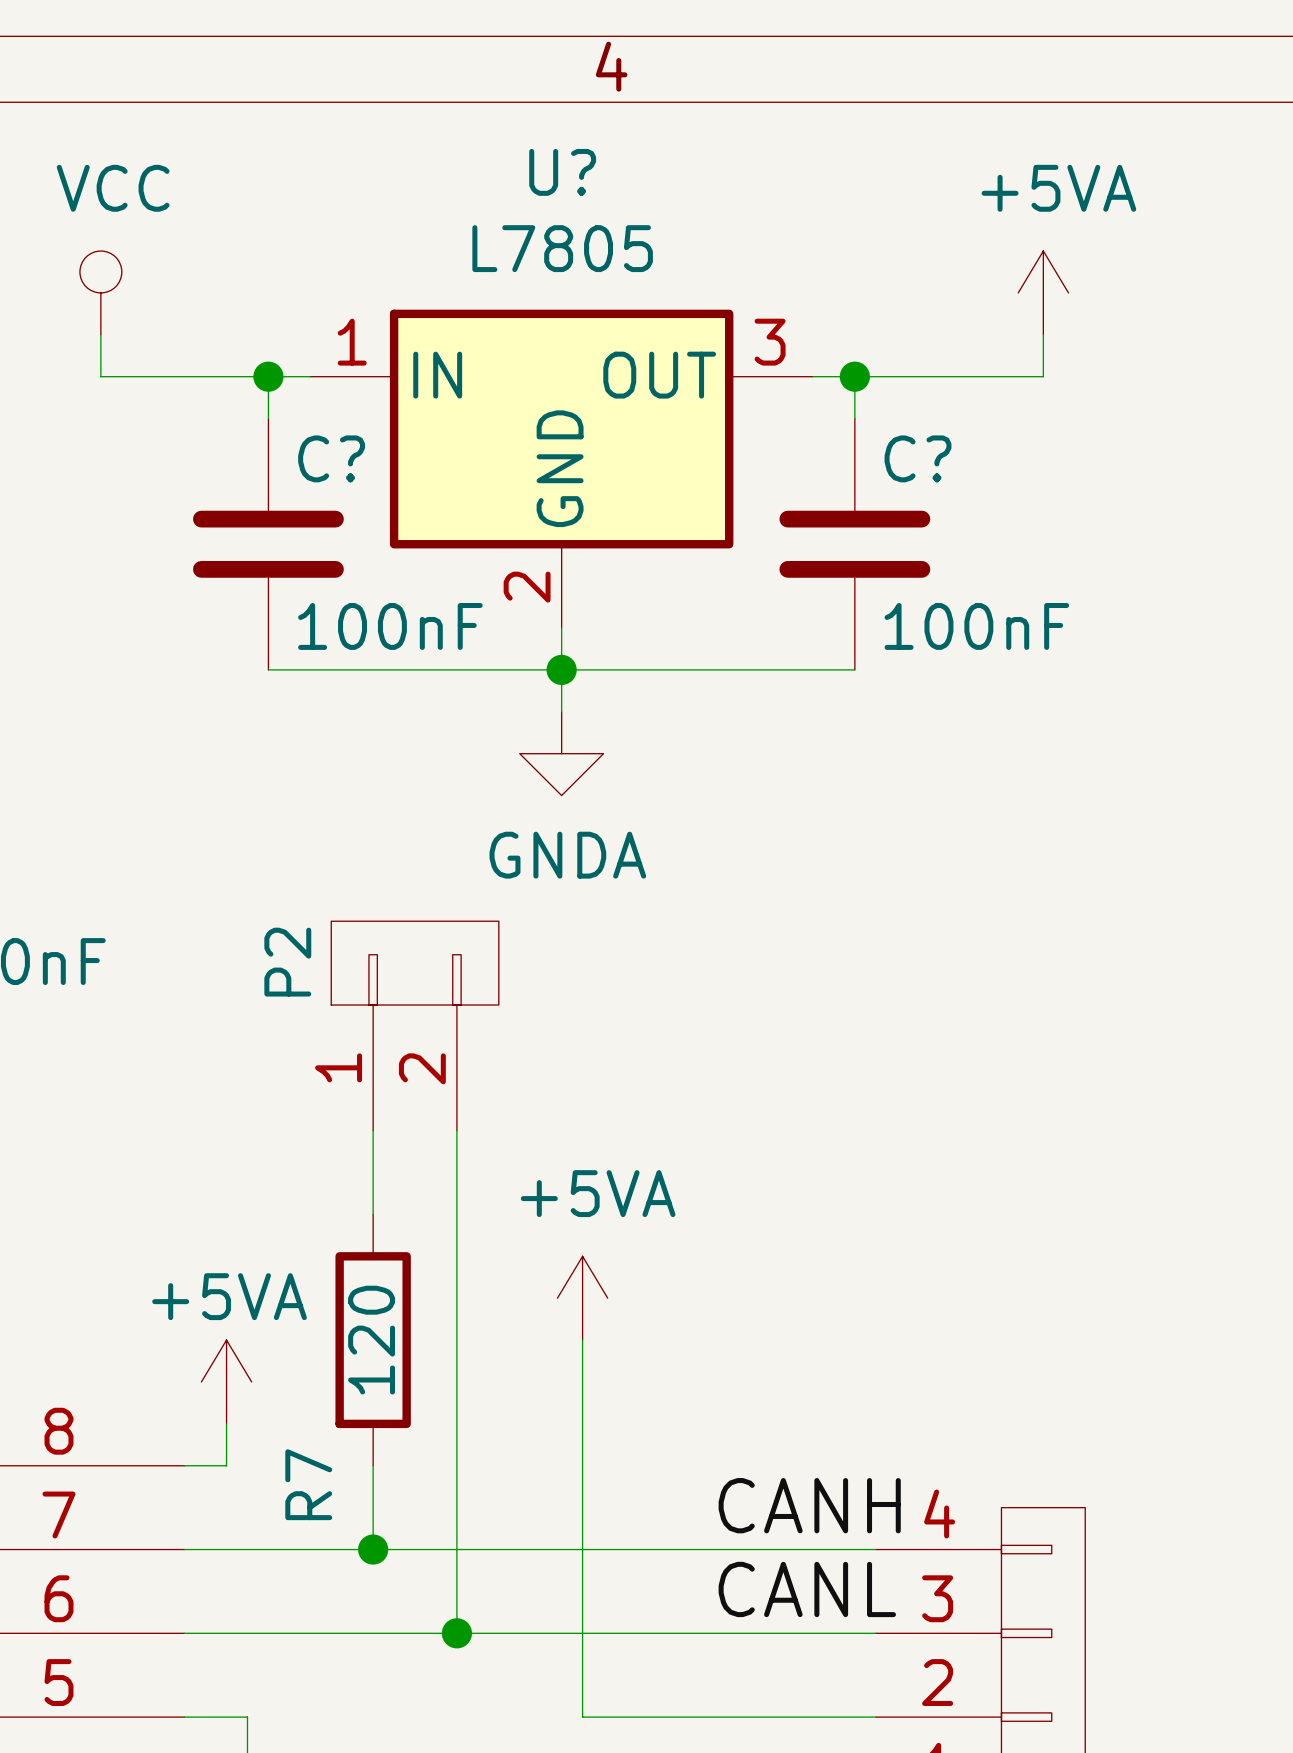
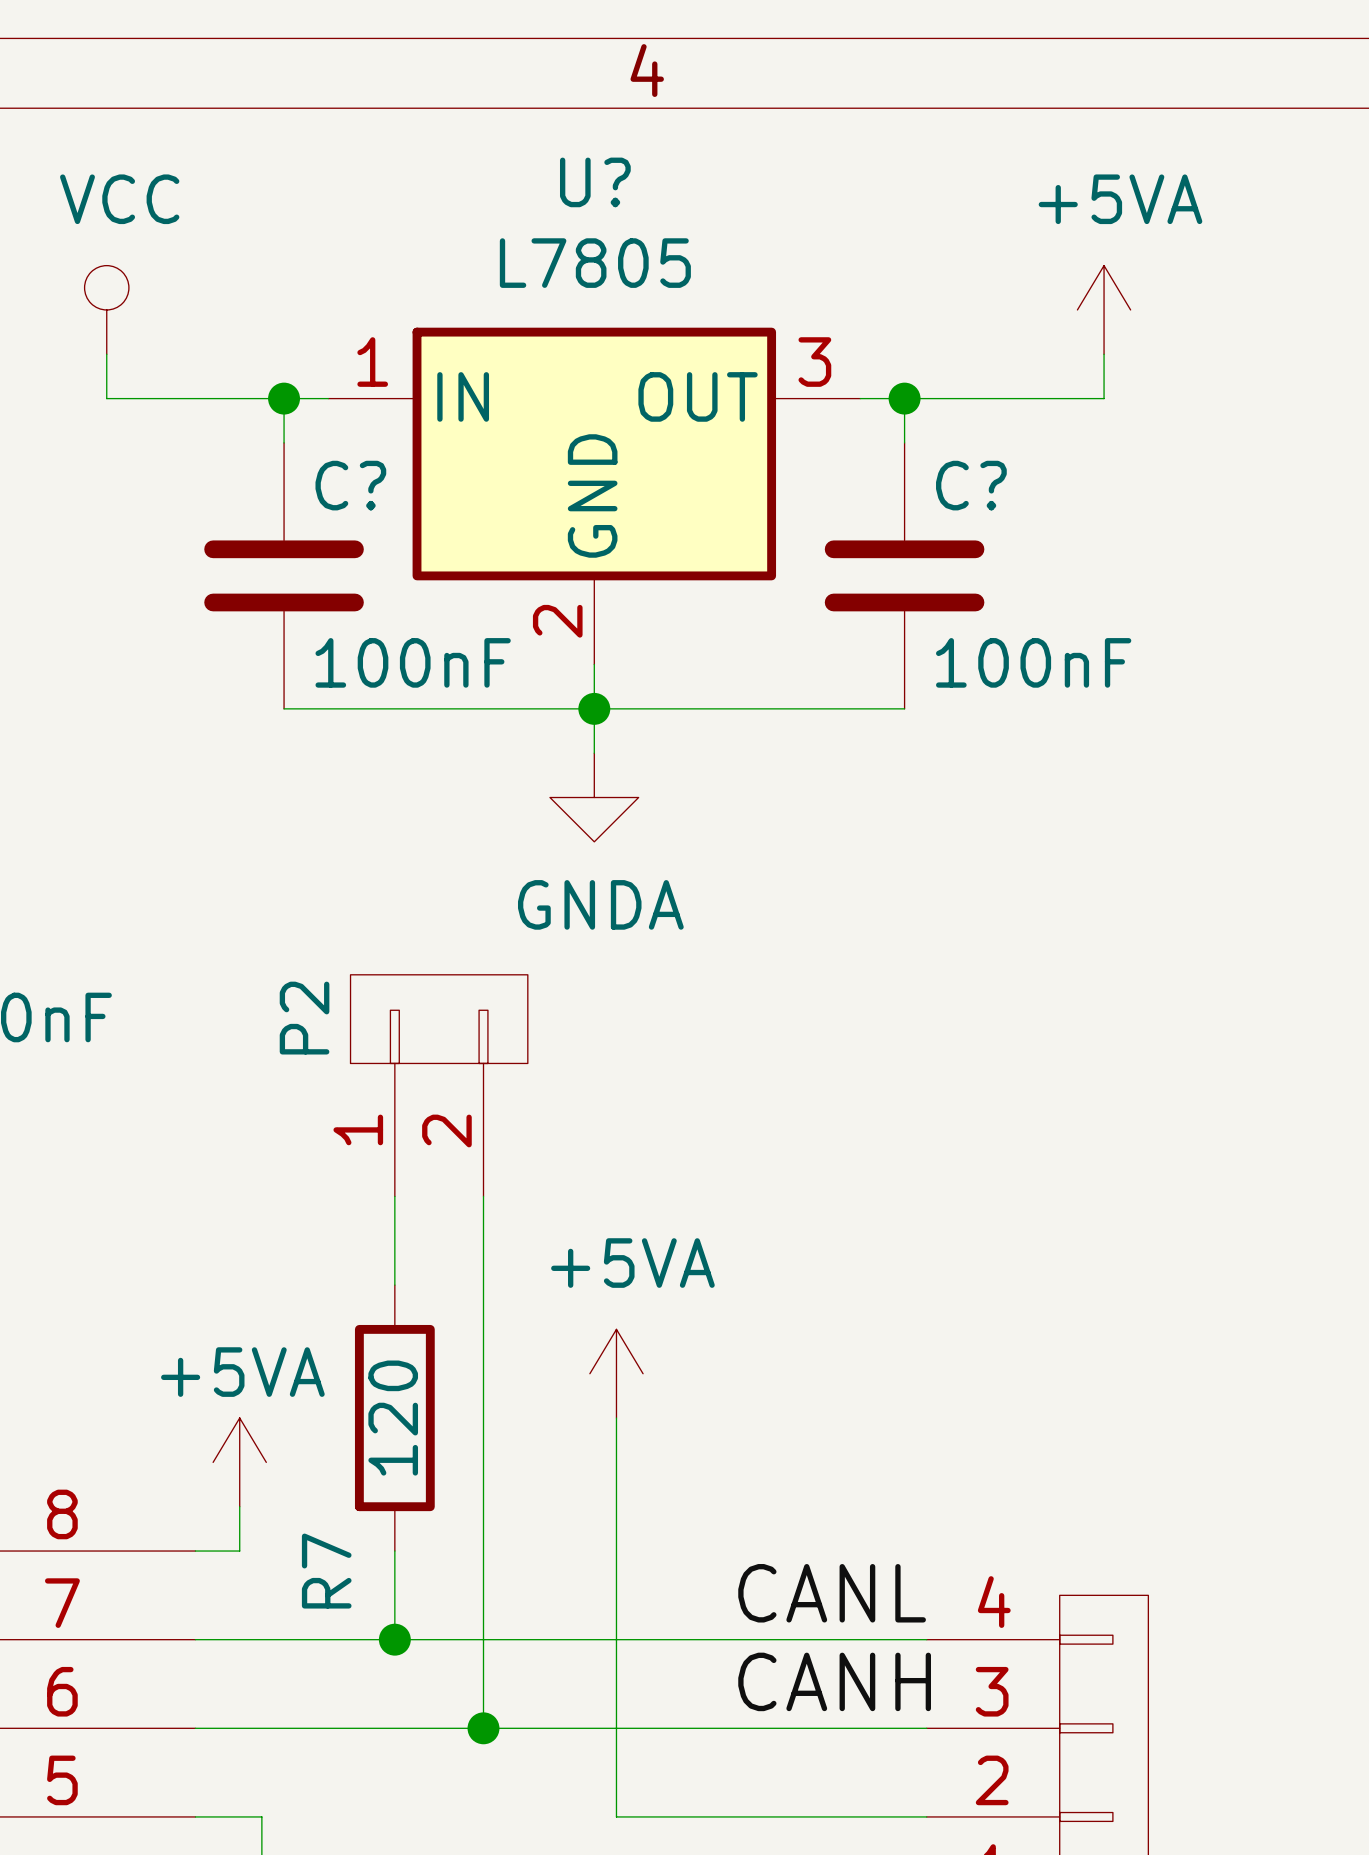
label: CANH (809, 1505) -> CANL (832, 1593)
label: CANL (807, 1589) -> CANH (834, 1681)

